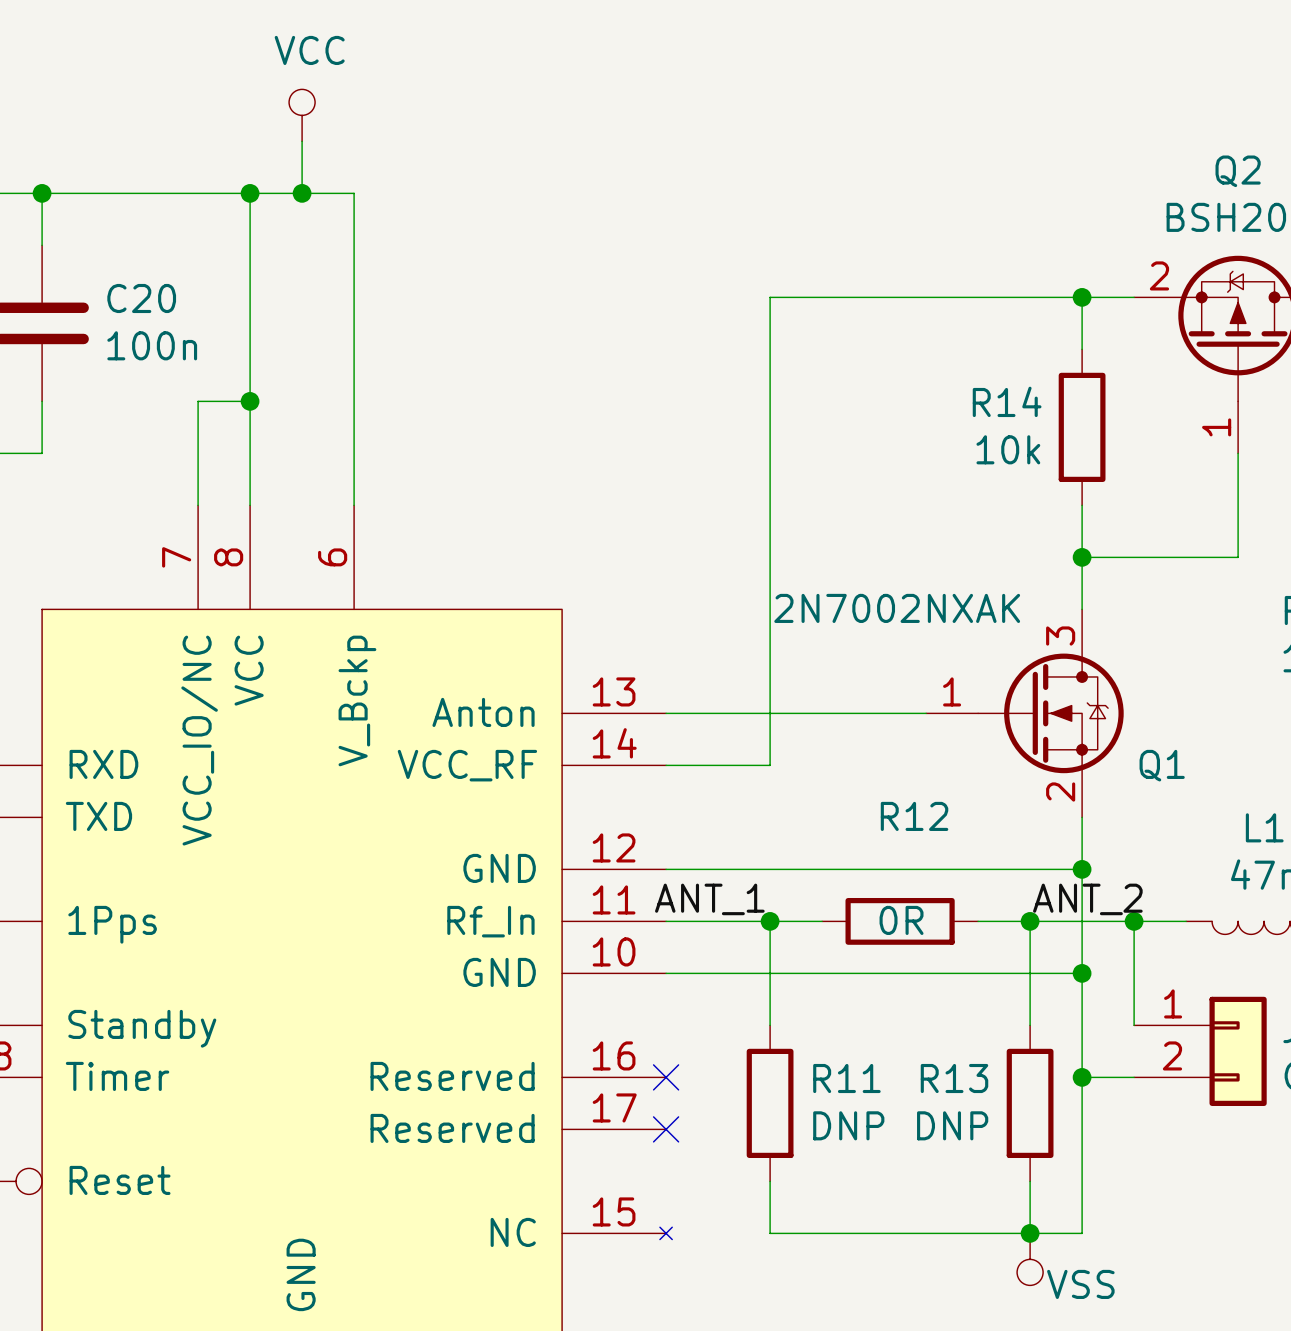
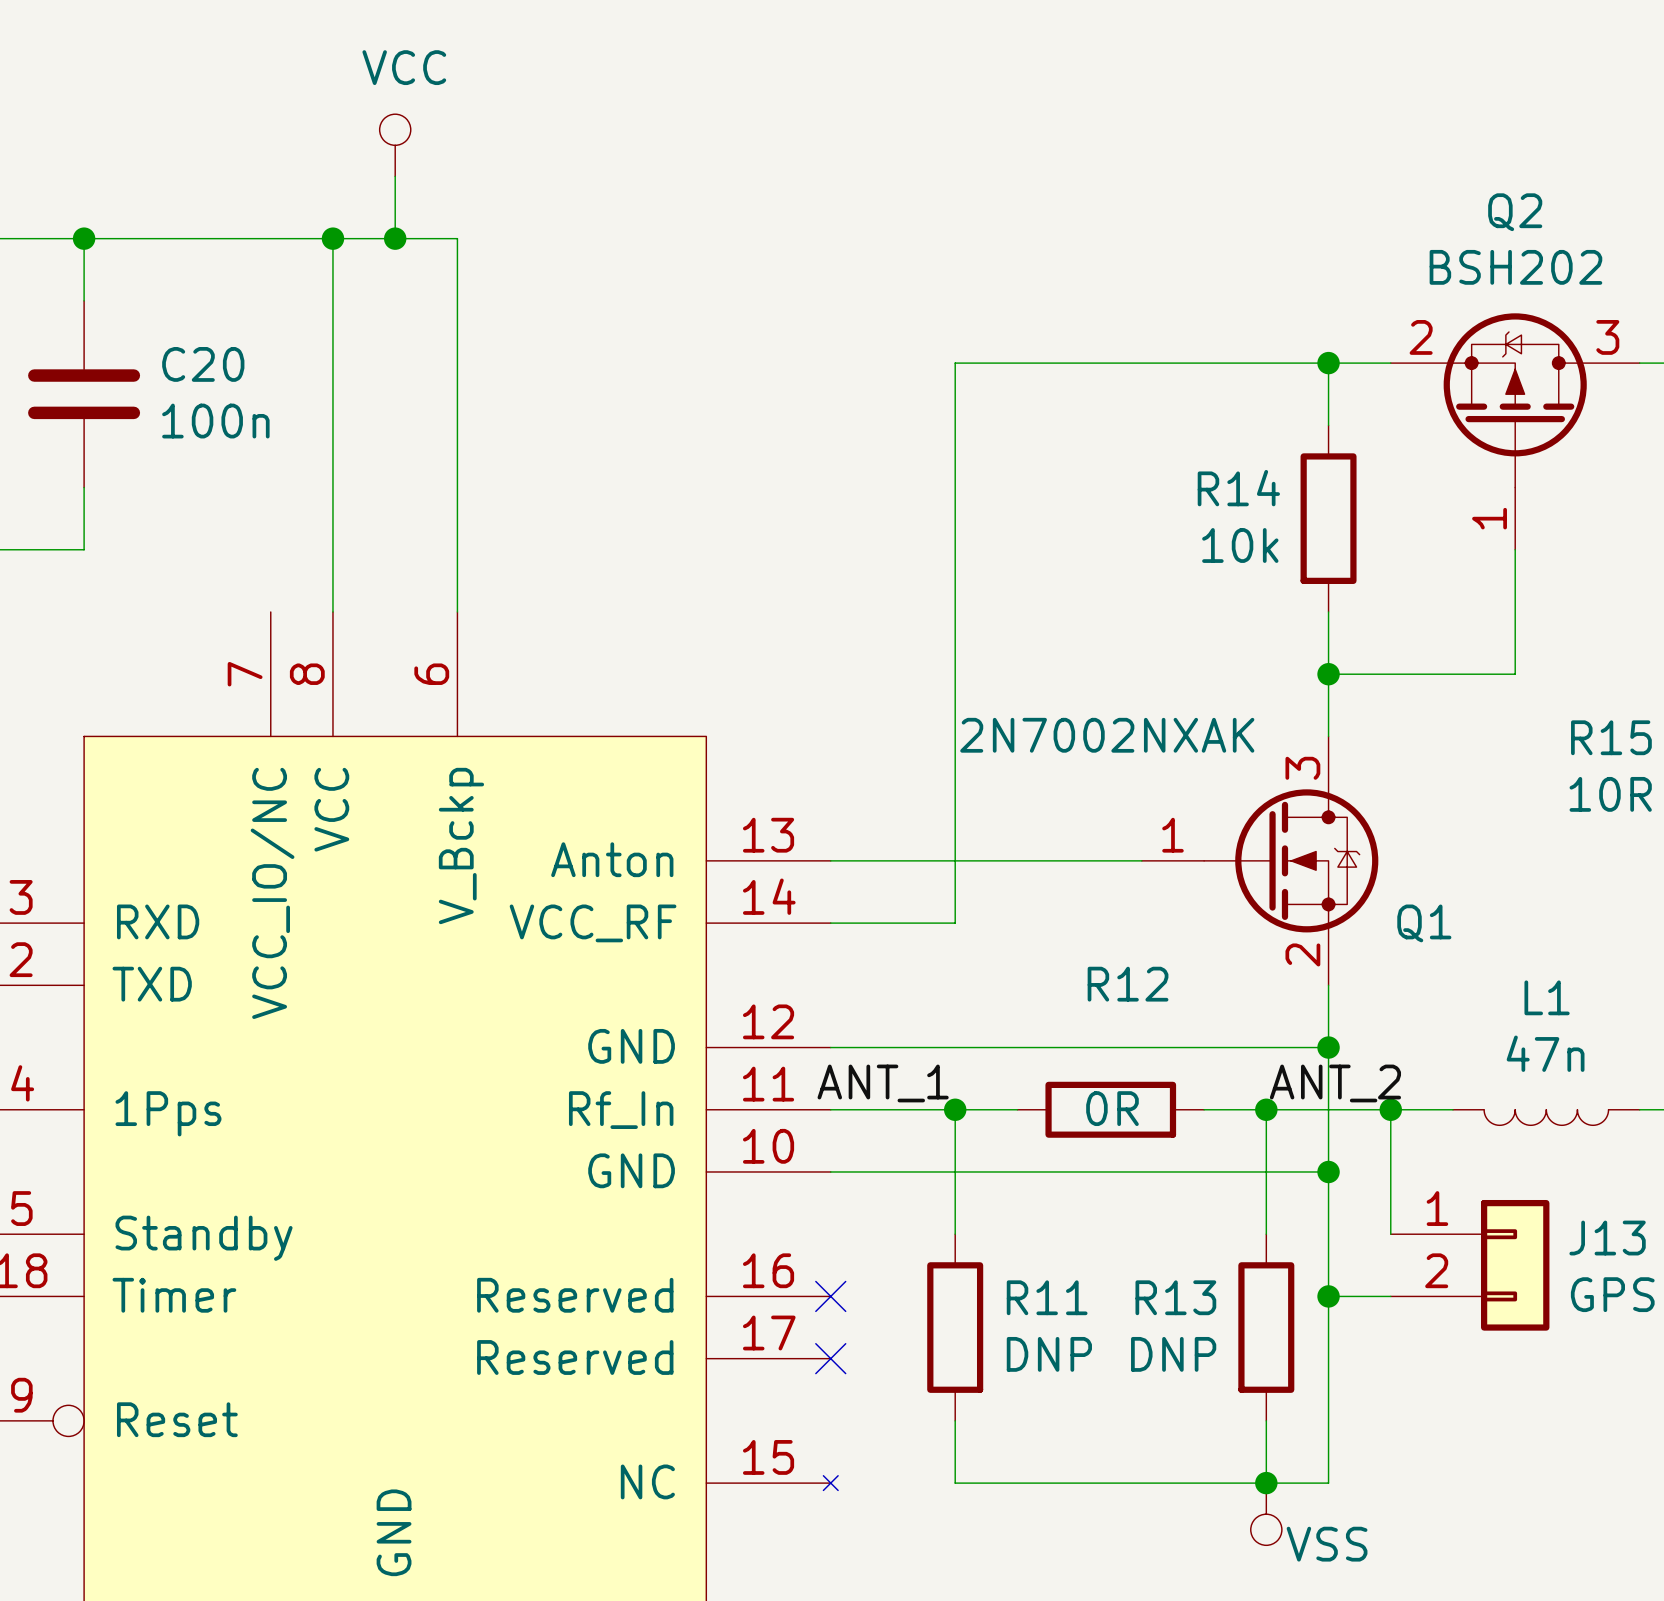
wire: (250, 401) (198, 401) (198, 505) -> none
junction: (250, 401) -> none

